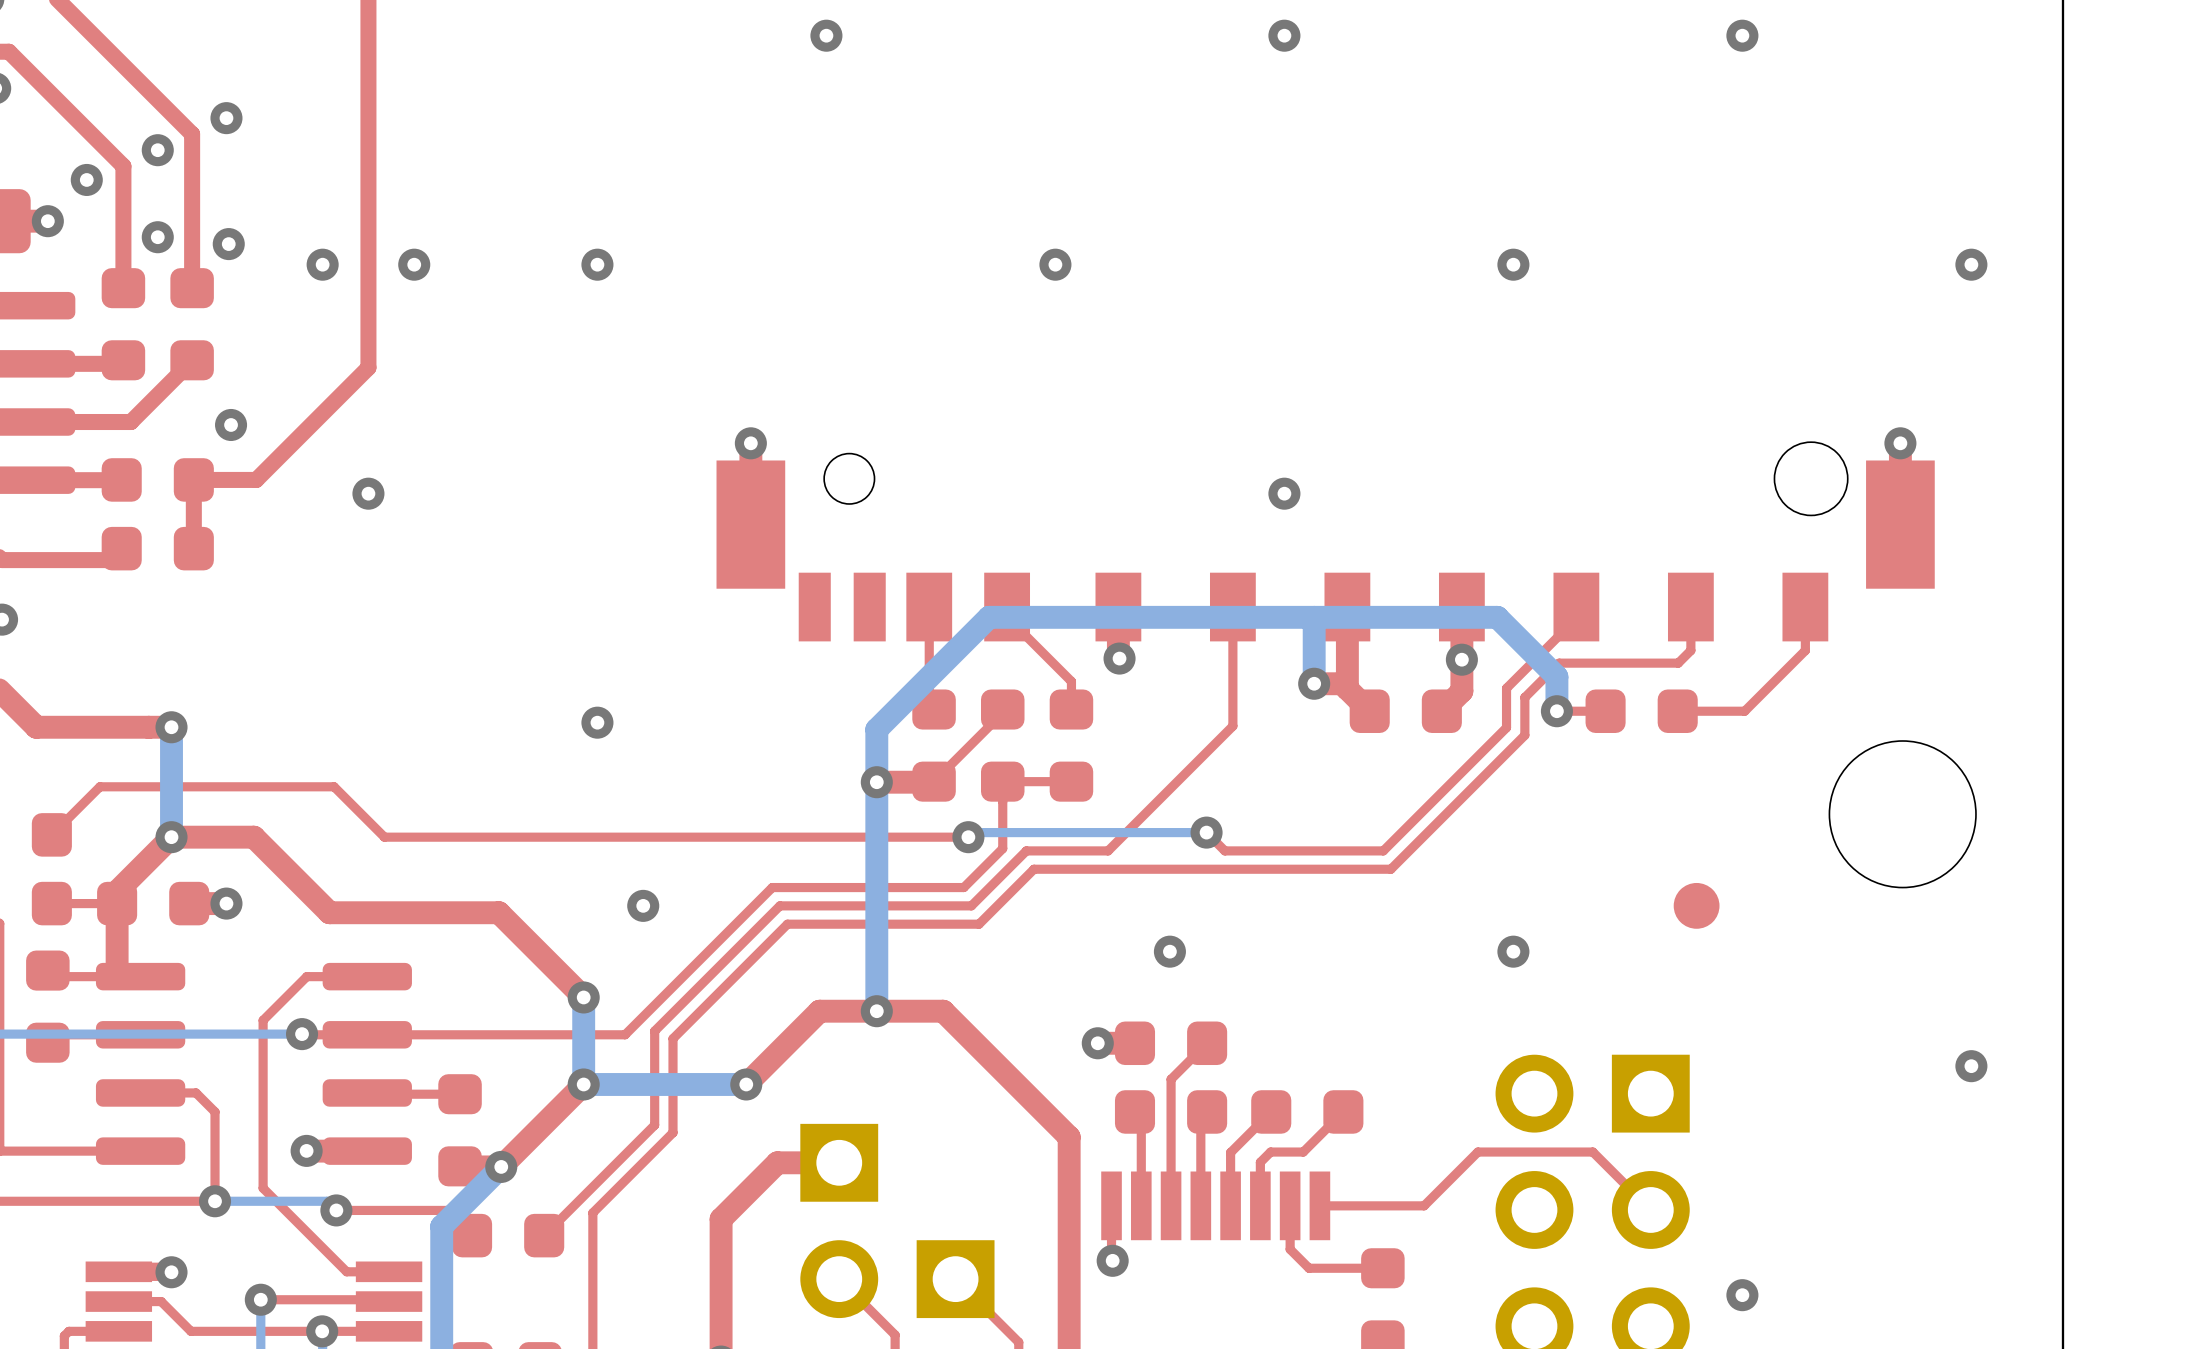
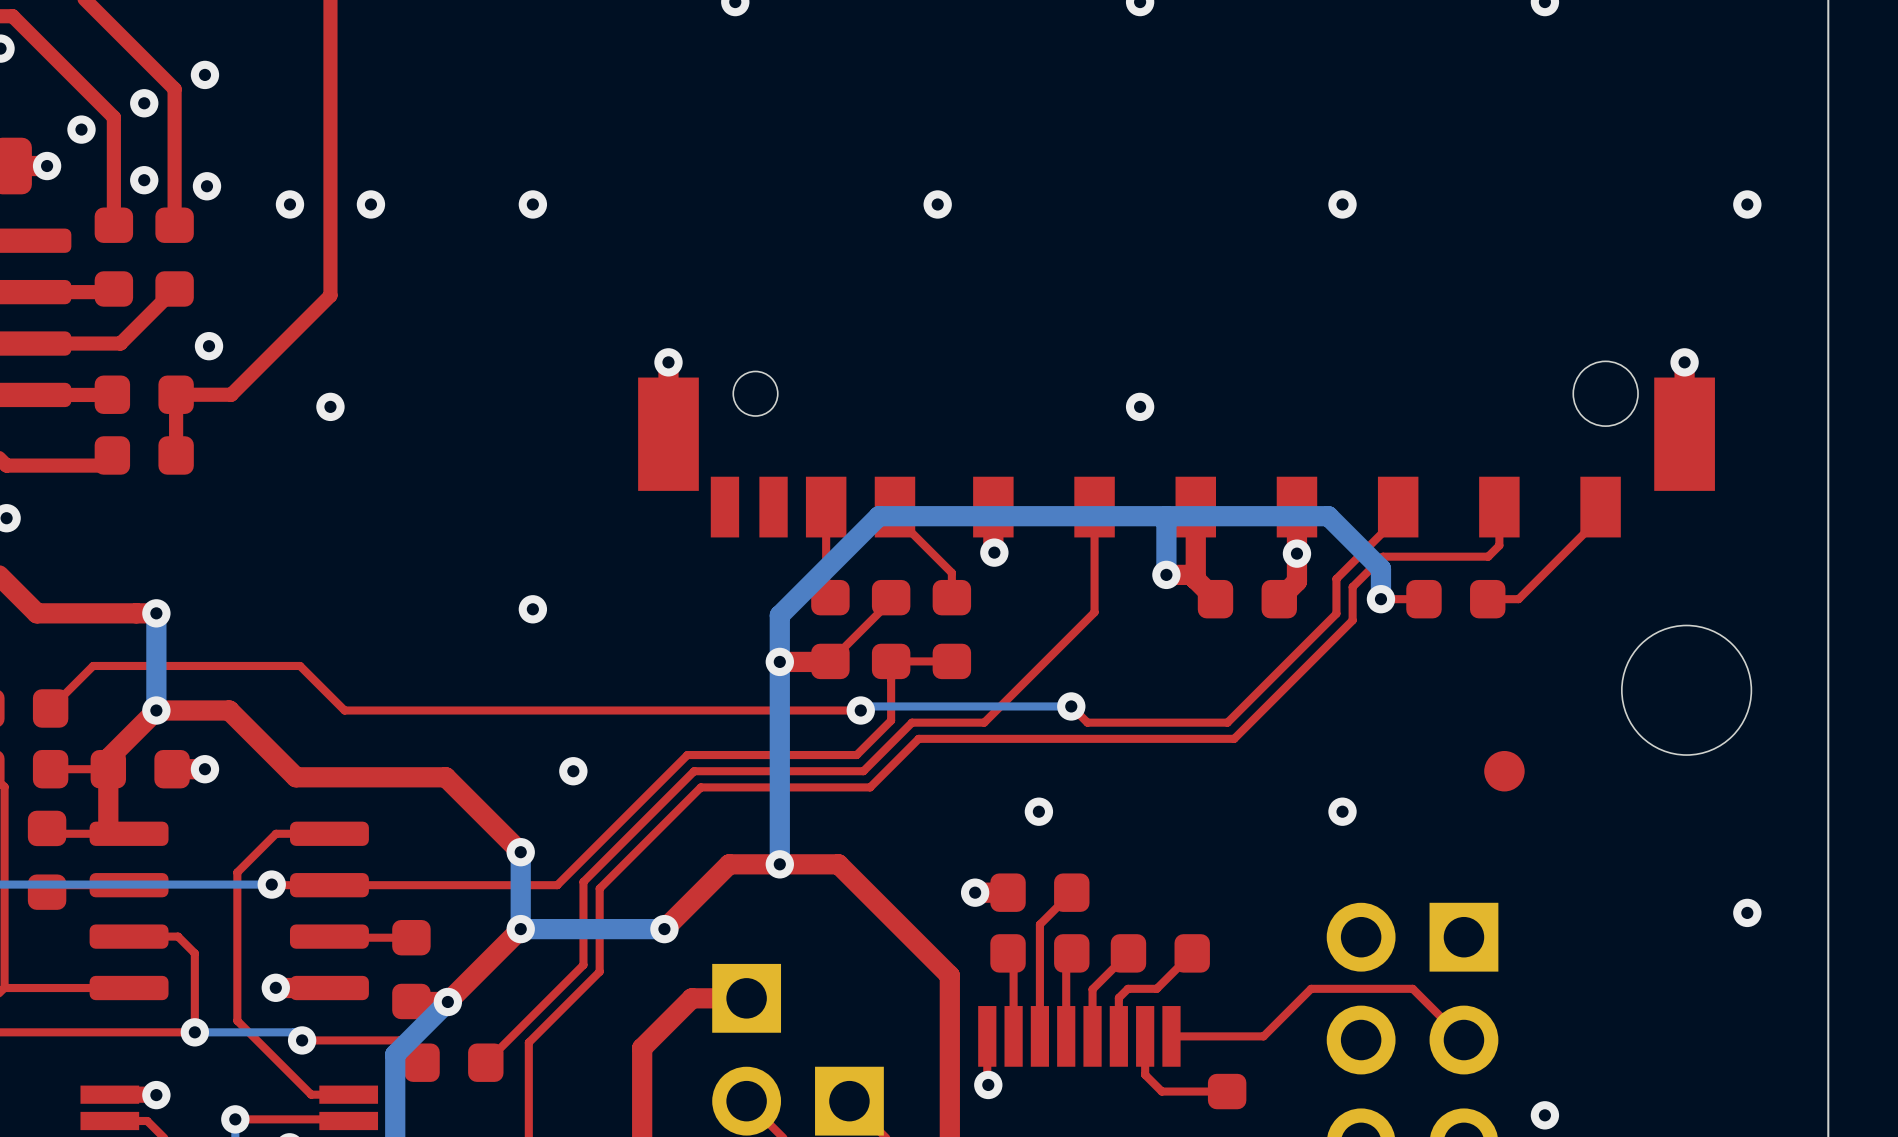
top track: (1805, 618) (1805, 650) (1744, 711) (1712, 711) -> (1600, 517) (1518, 599)

